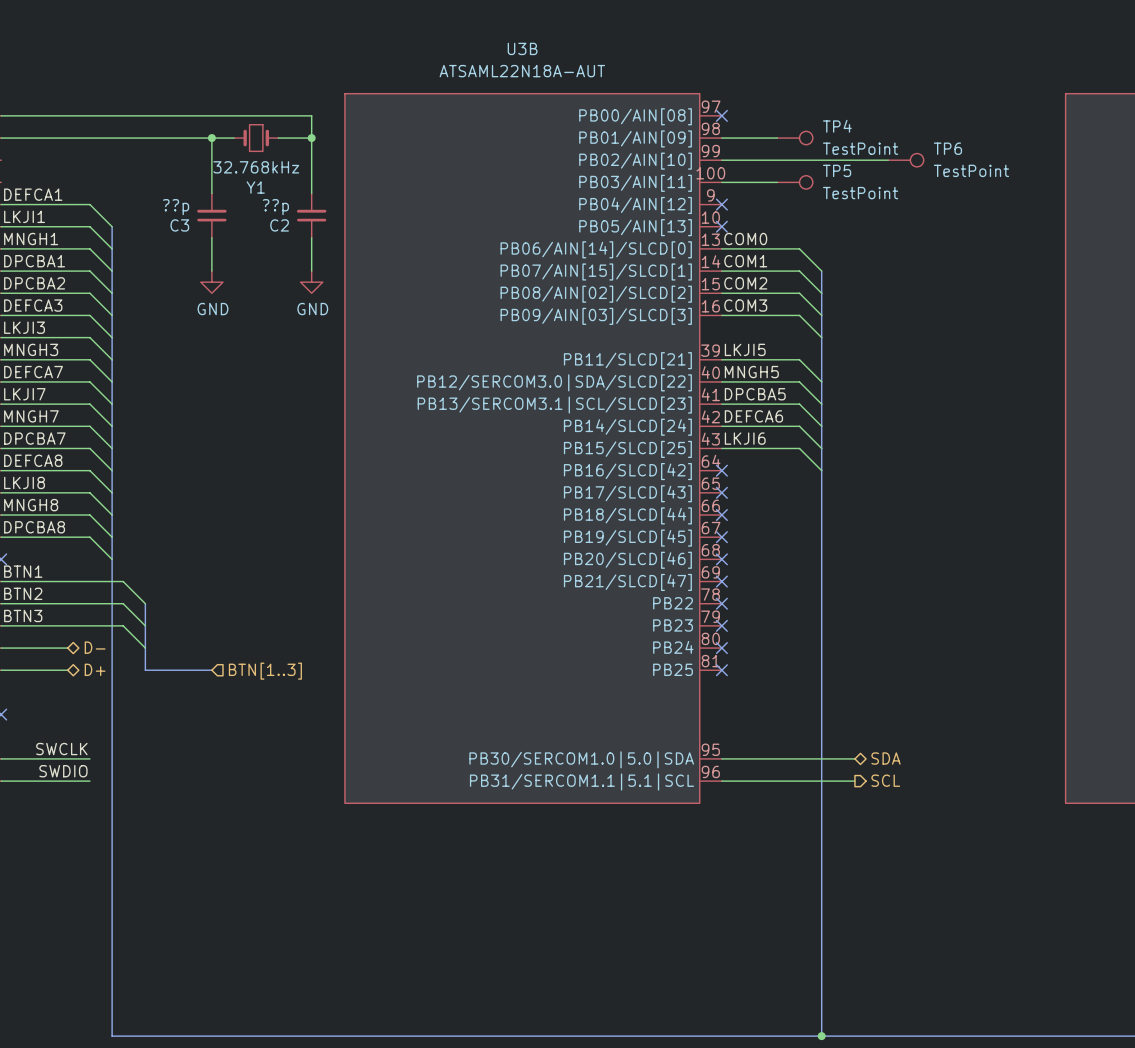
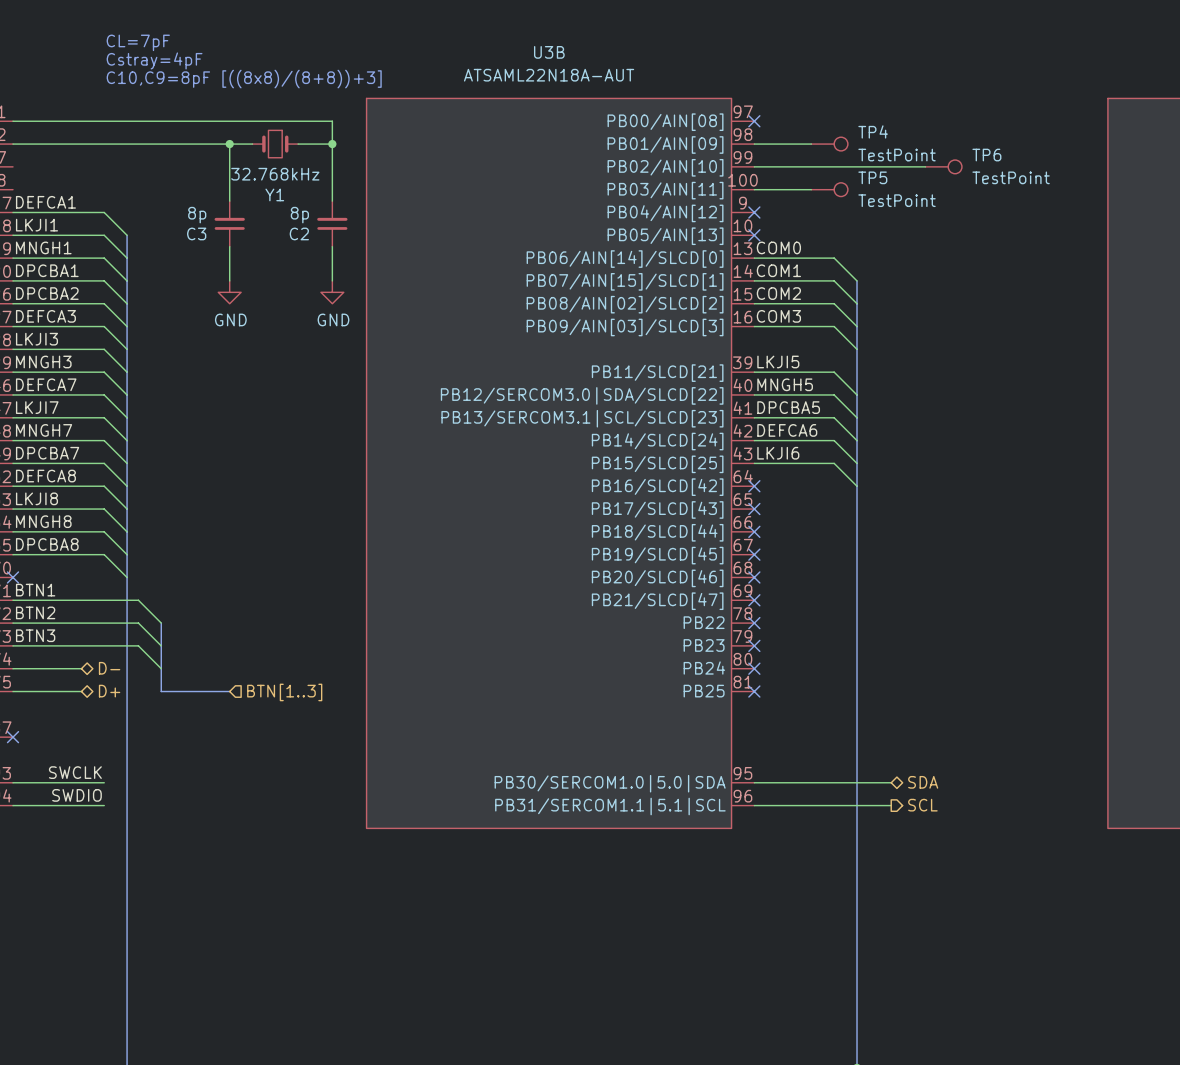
text: none -> CL=7pF (138, 42)
text: none -> Cstray=4pF (154, 60)
text: none -> C10,C9=8pF [((8x8)/(8+8))+3] (244, 79)
C3 value: ??p (176, 207) -> 8p (197, 215)
C2 value: ??p (275, 207) -> 8p (299, 215)

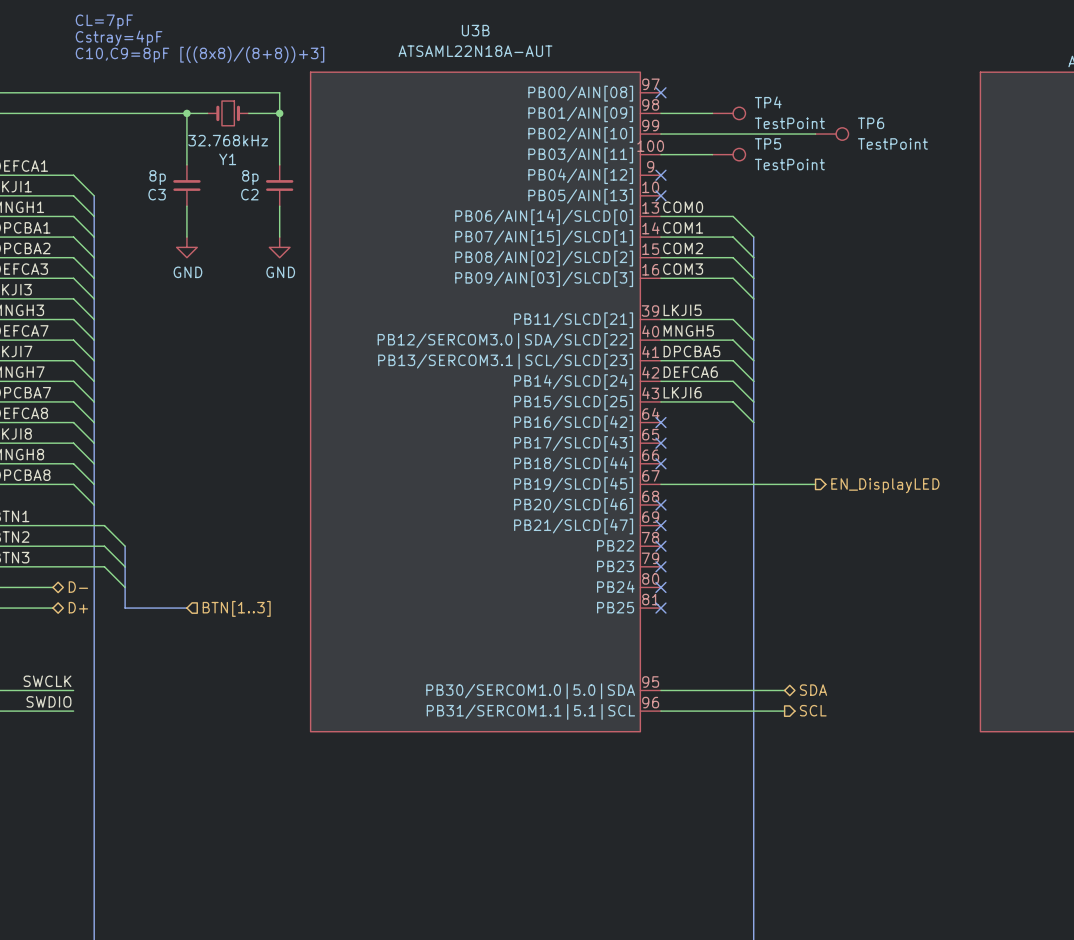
wire: none -> (660, 484) (815, 484)
no-connect mark: (754, 554) -> none
hierarchical label: none -> EN_DisplayLED (885, 485)

